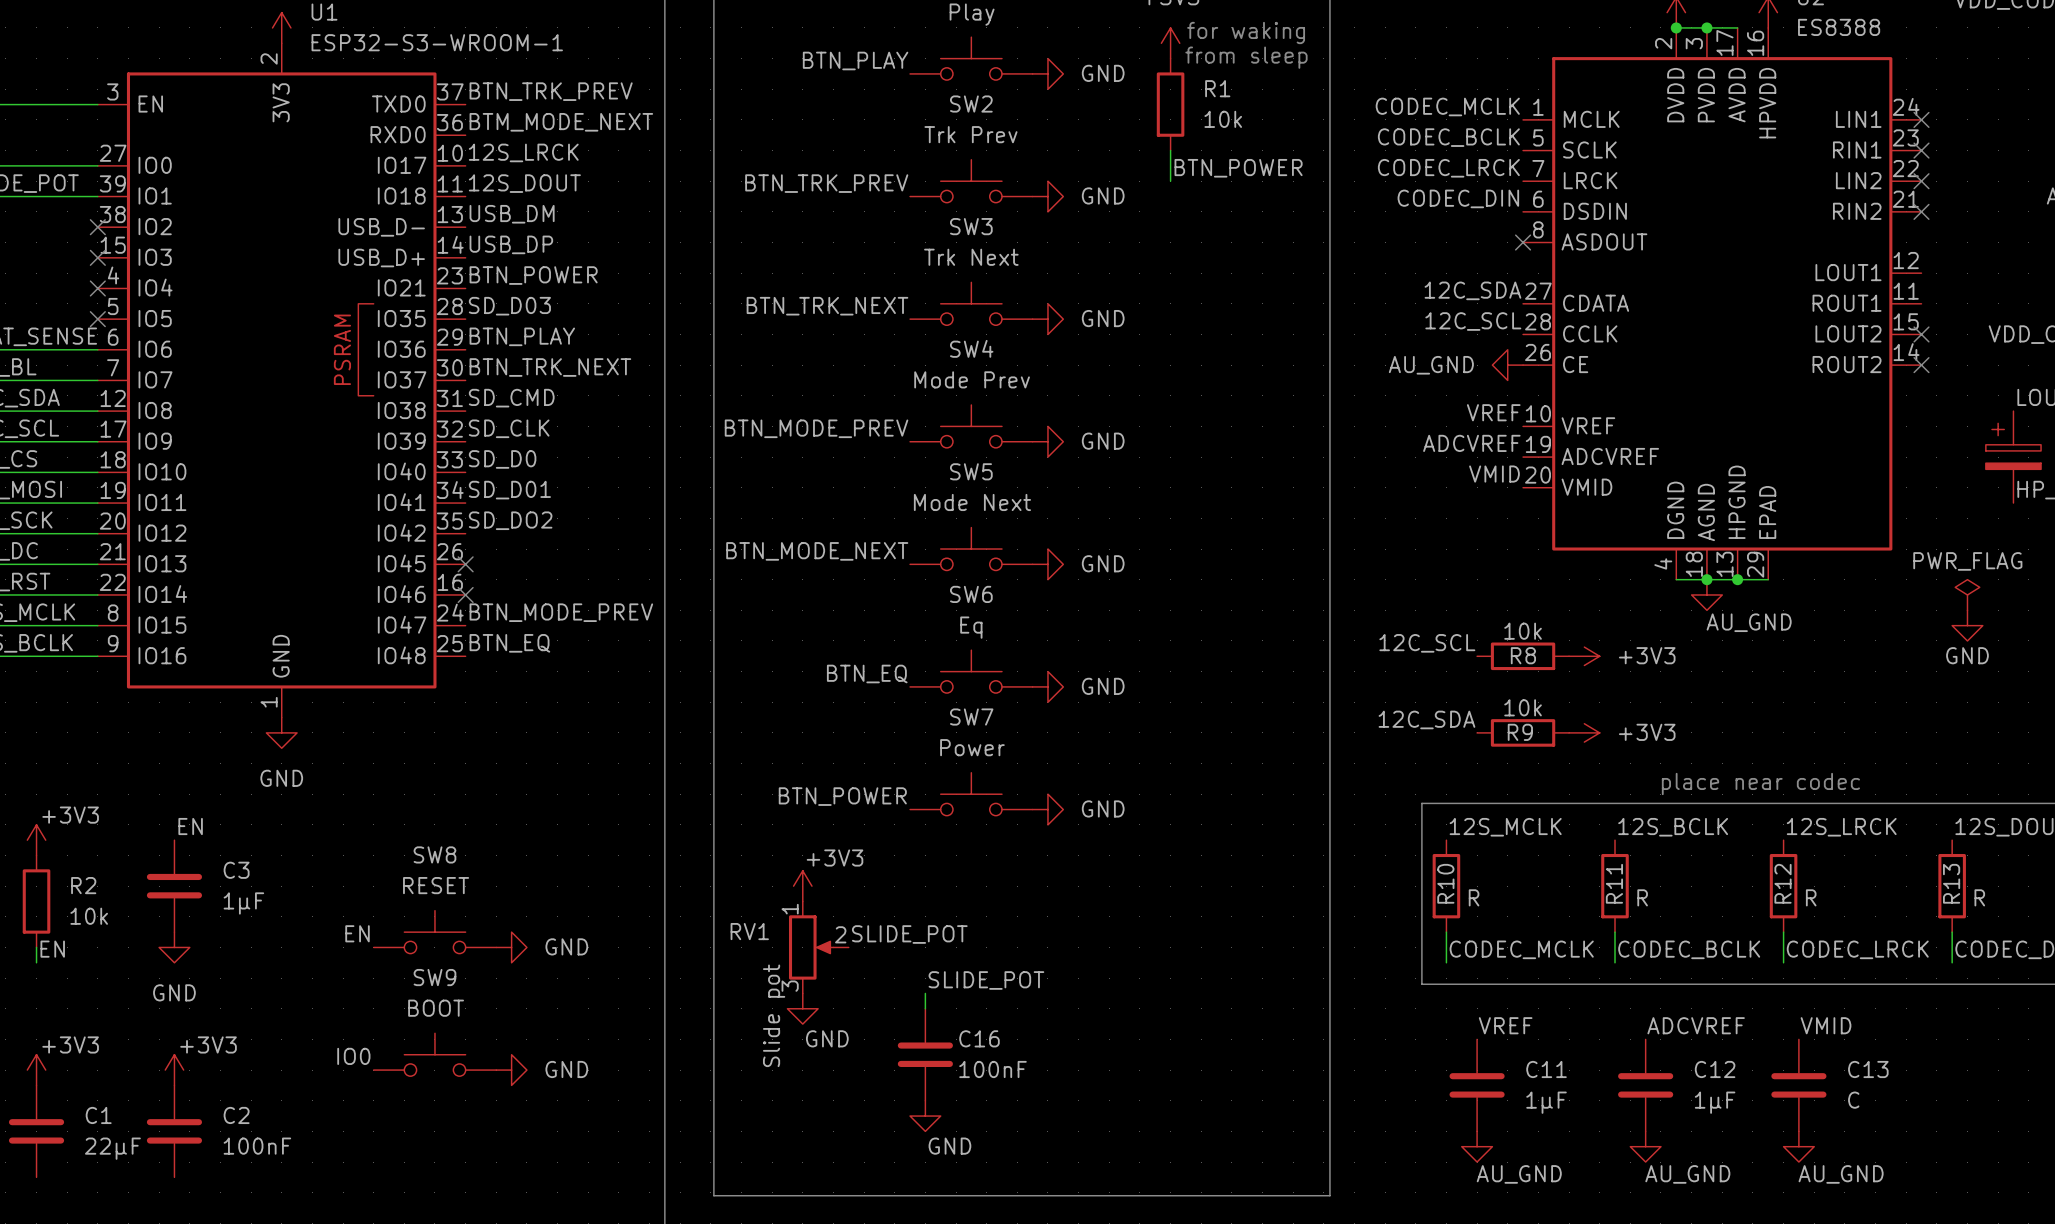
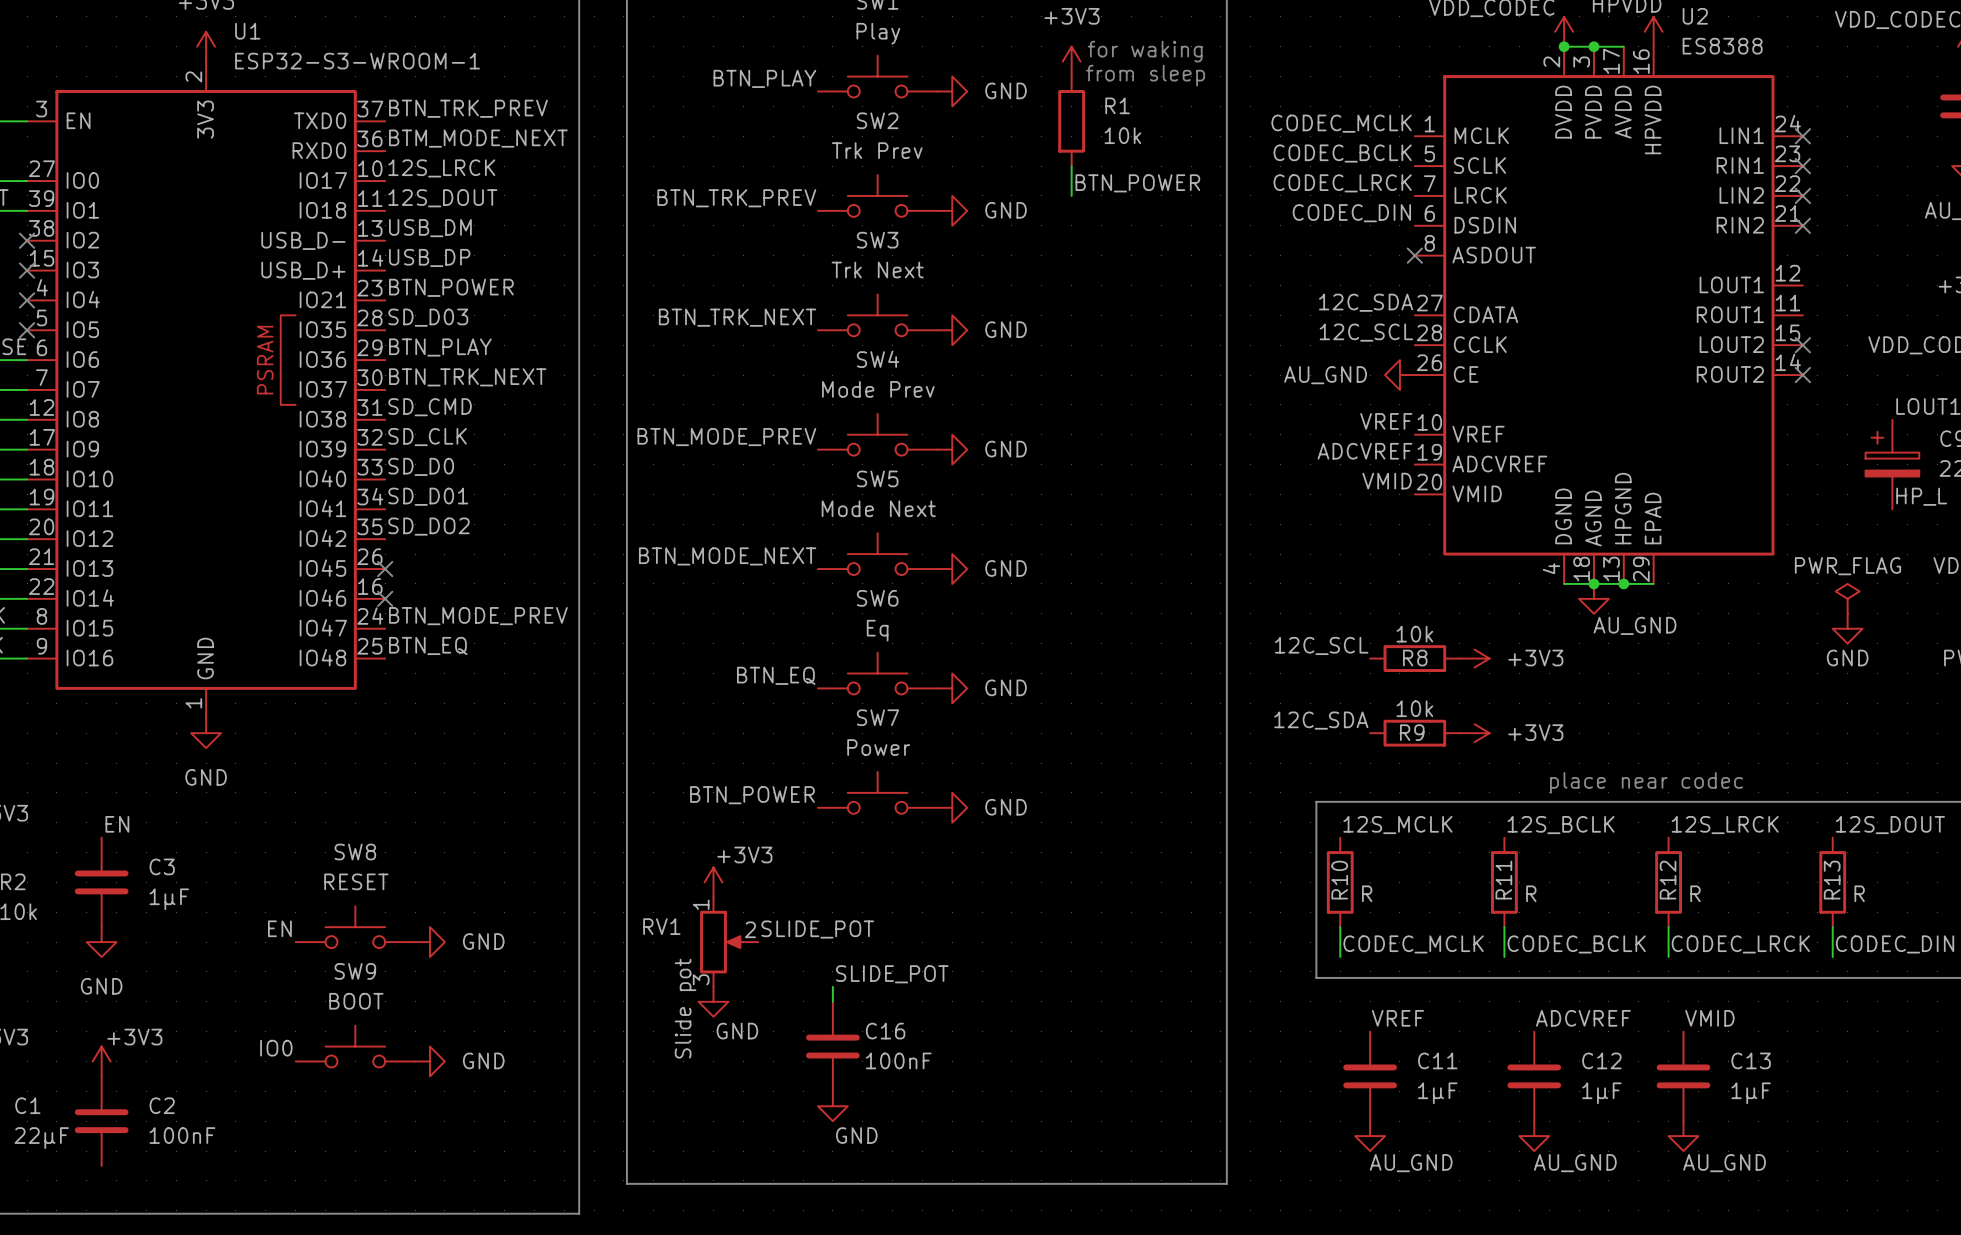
C13 value: C (1853, 1100) -> 1μF (1751, 1093)

